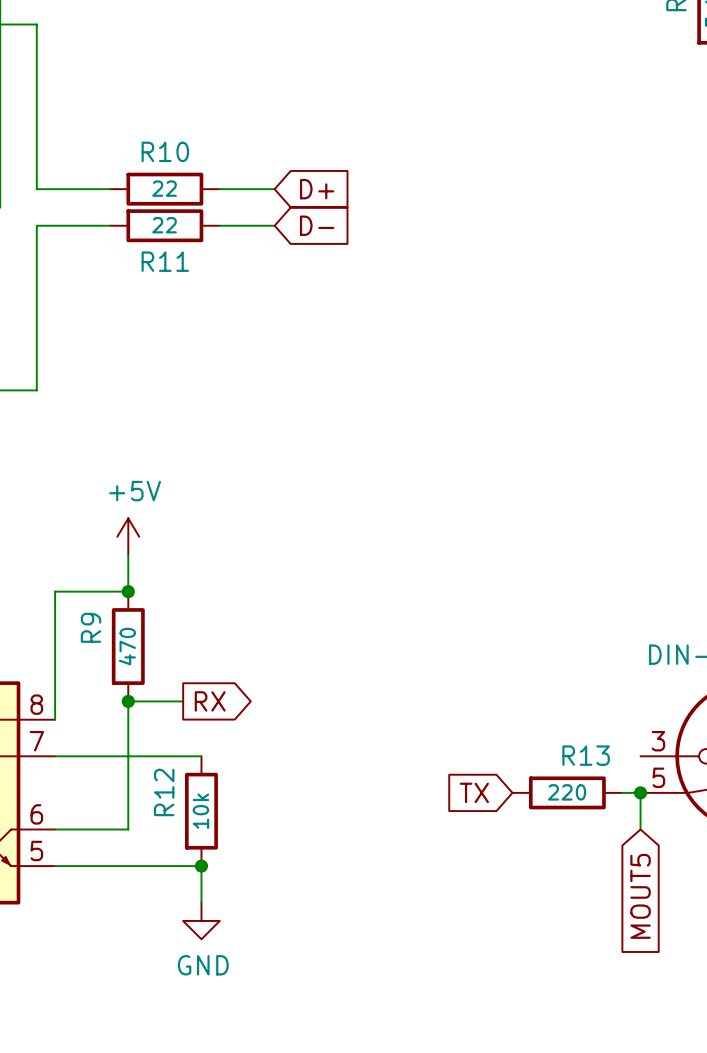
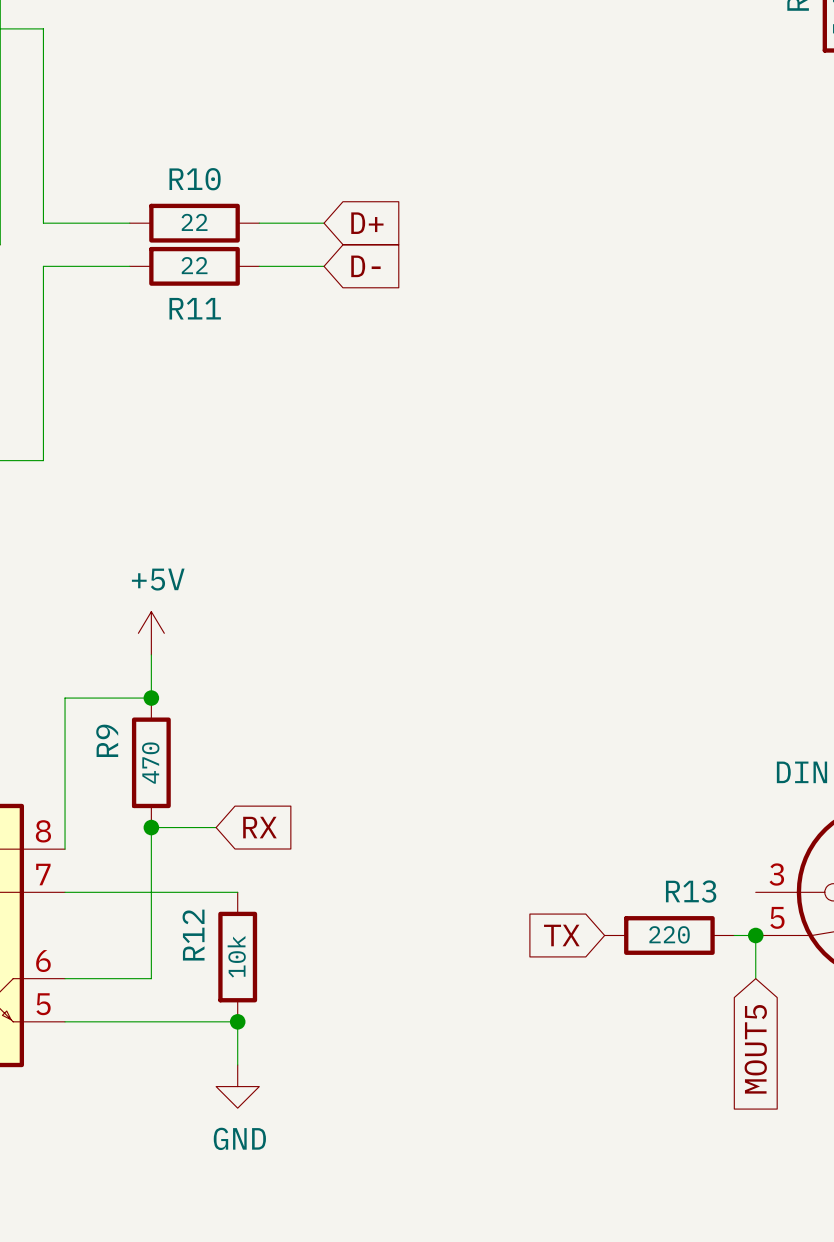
global label shape: output (210, 701) -> input (259, 827)

